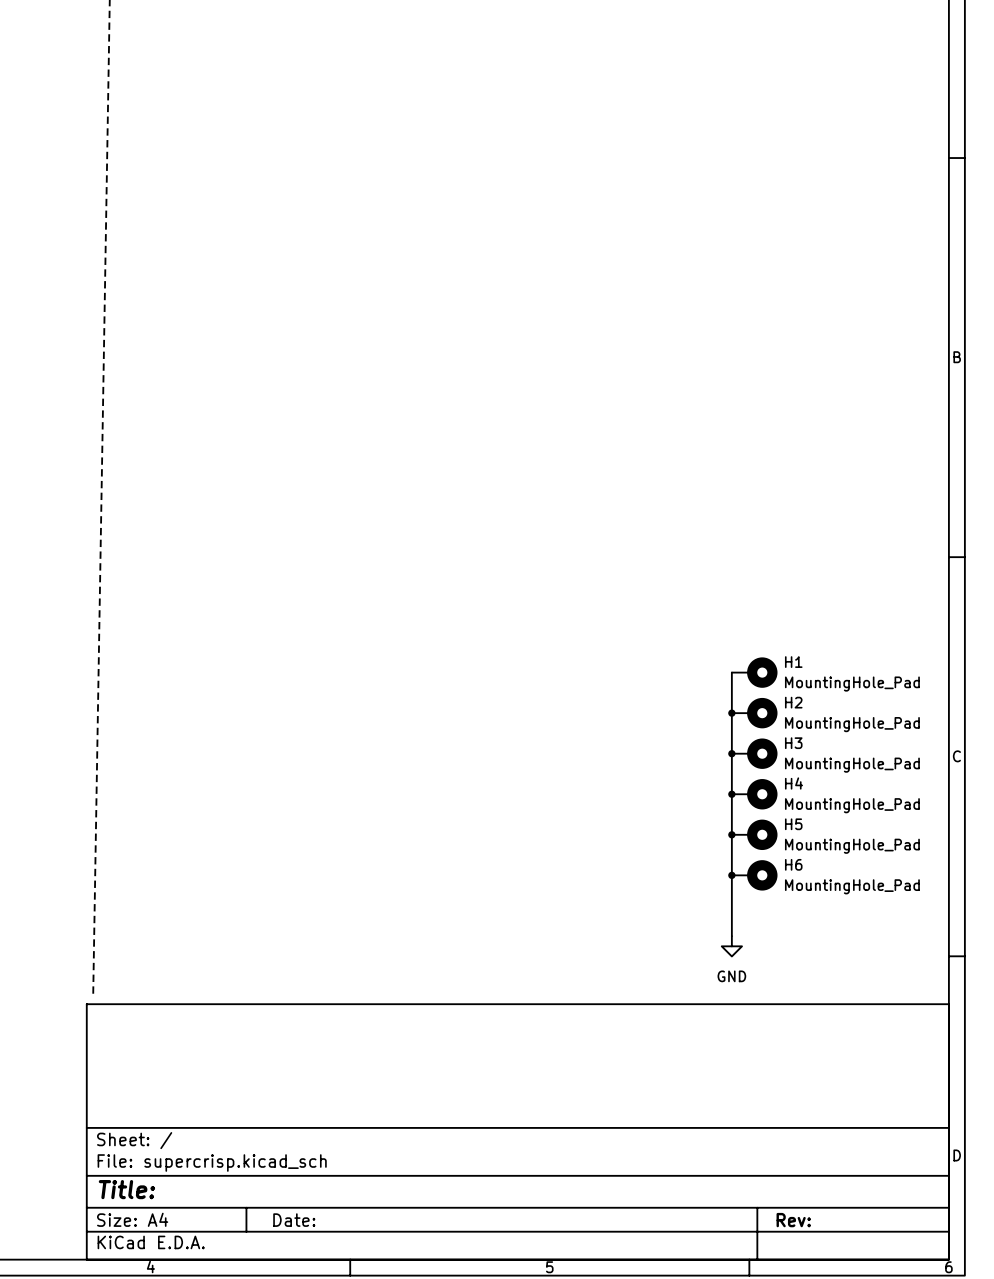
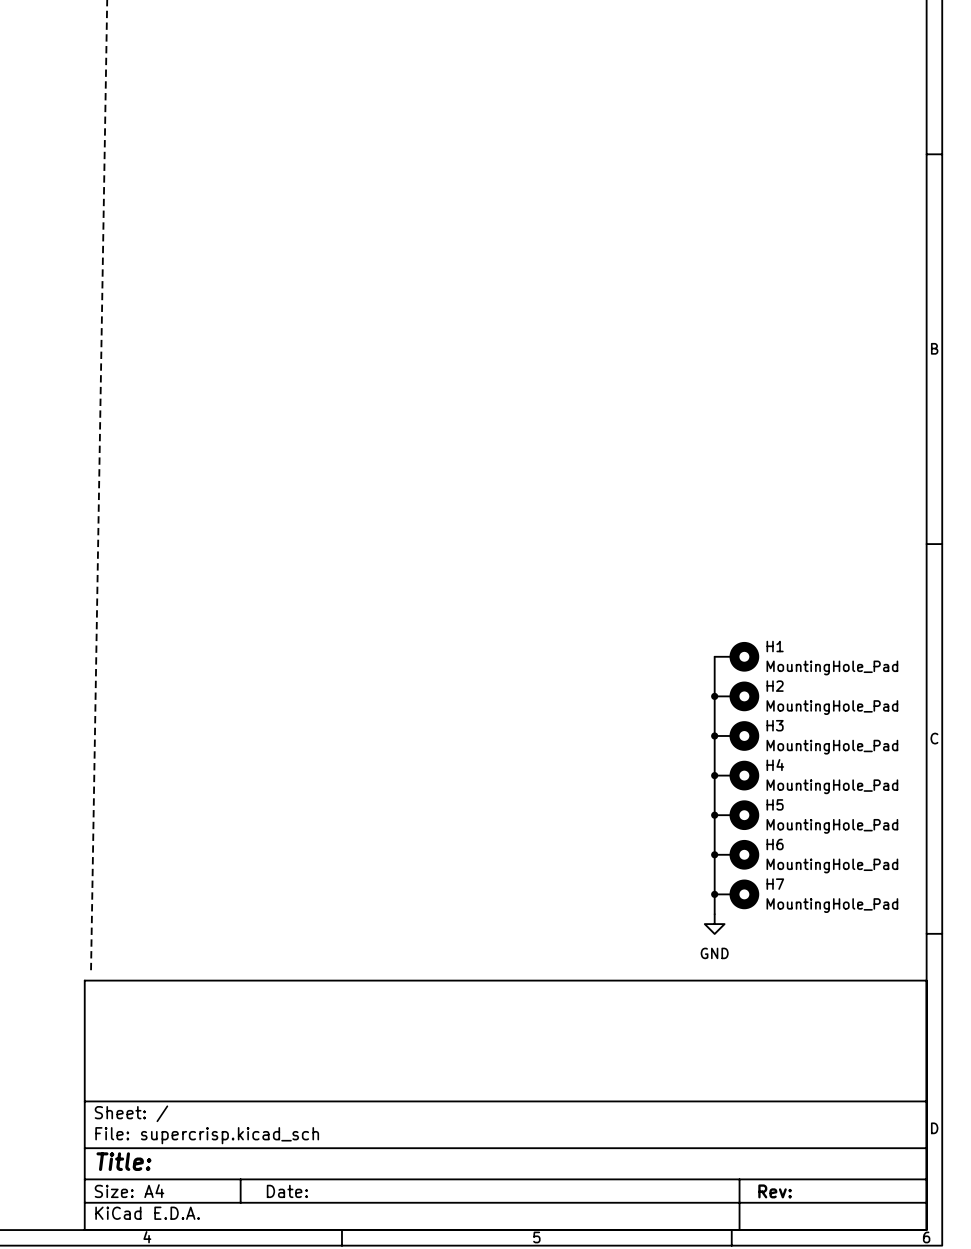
junction: none -> (714, 894)
H7: none -> MountingHole_Pad (736, 894)

